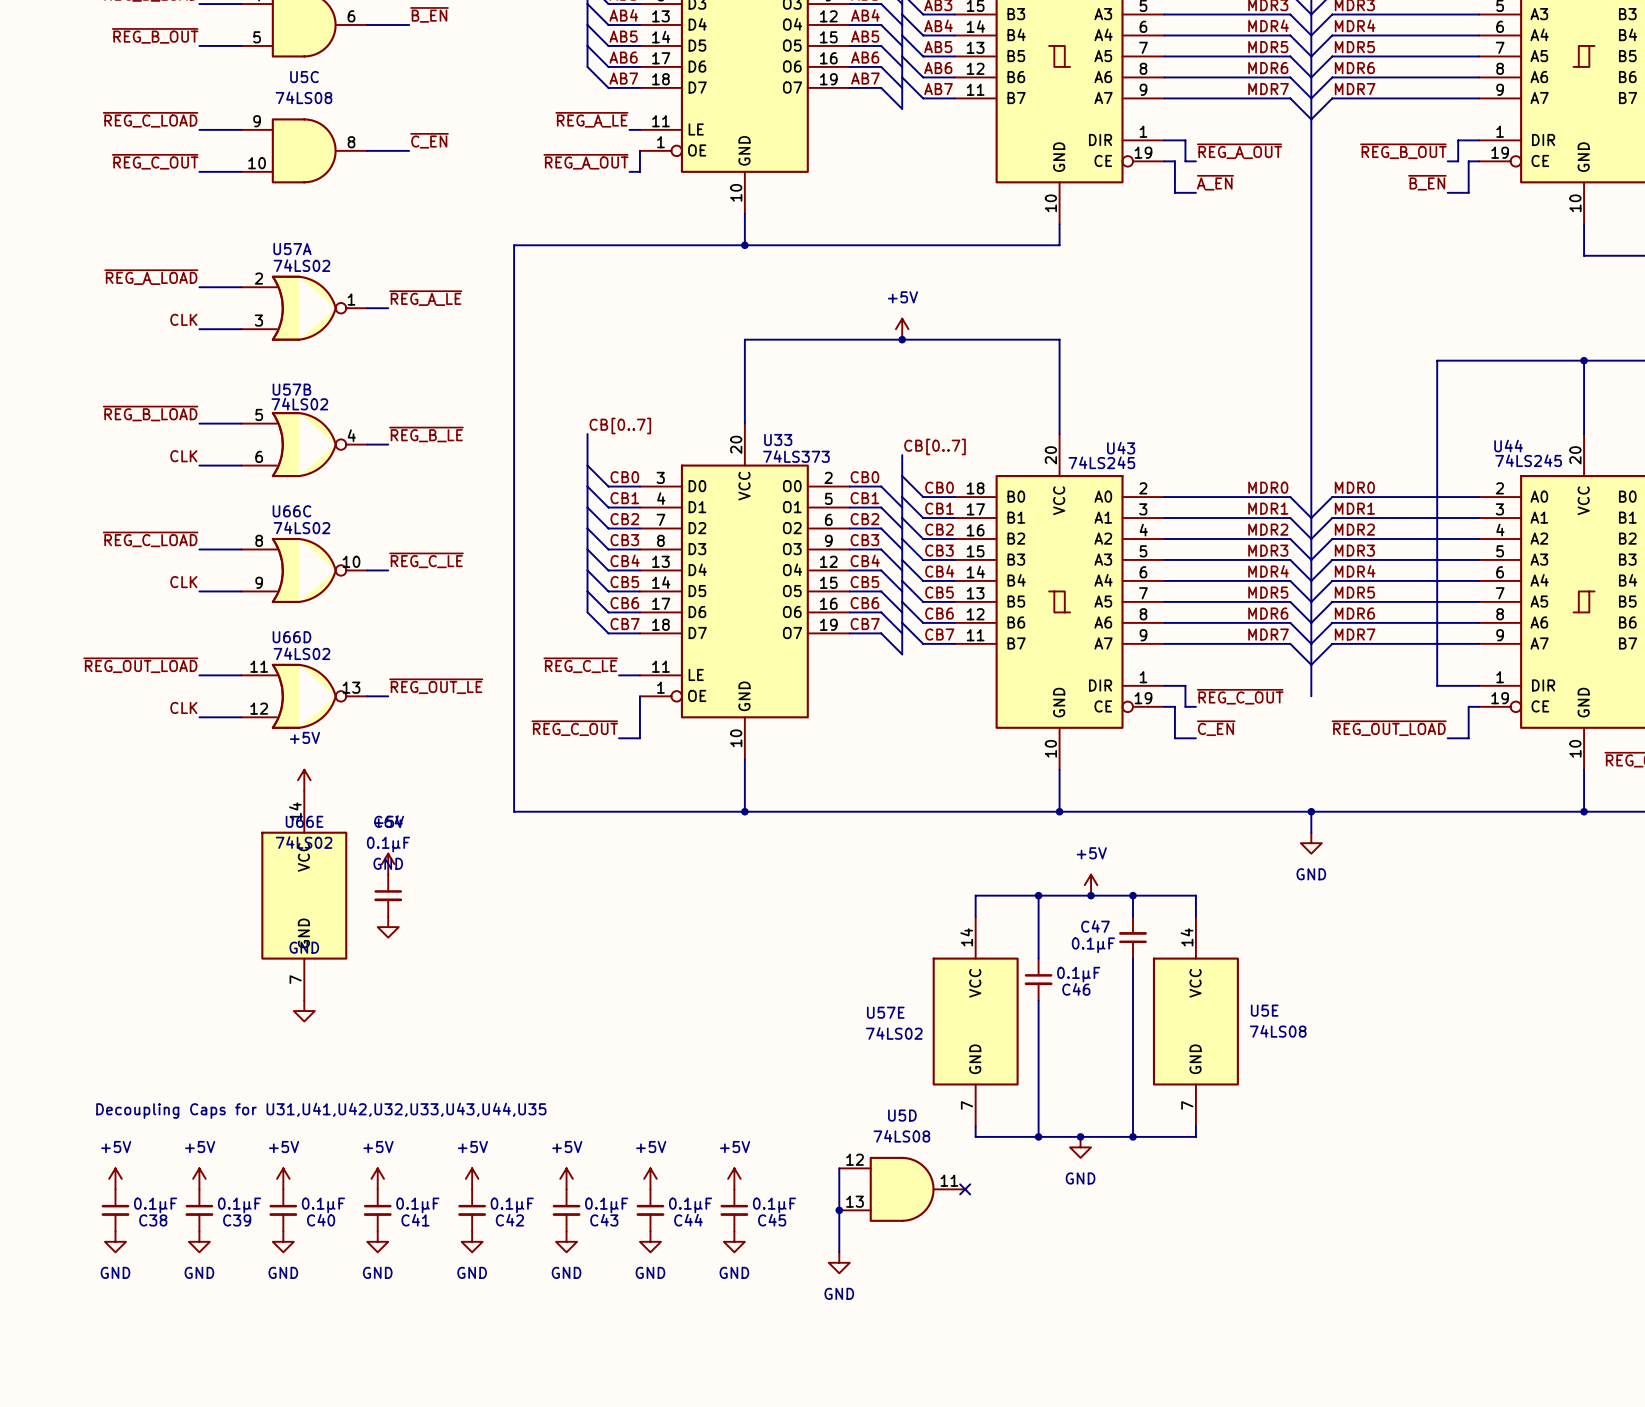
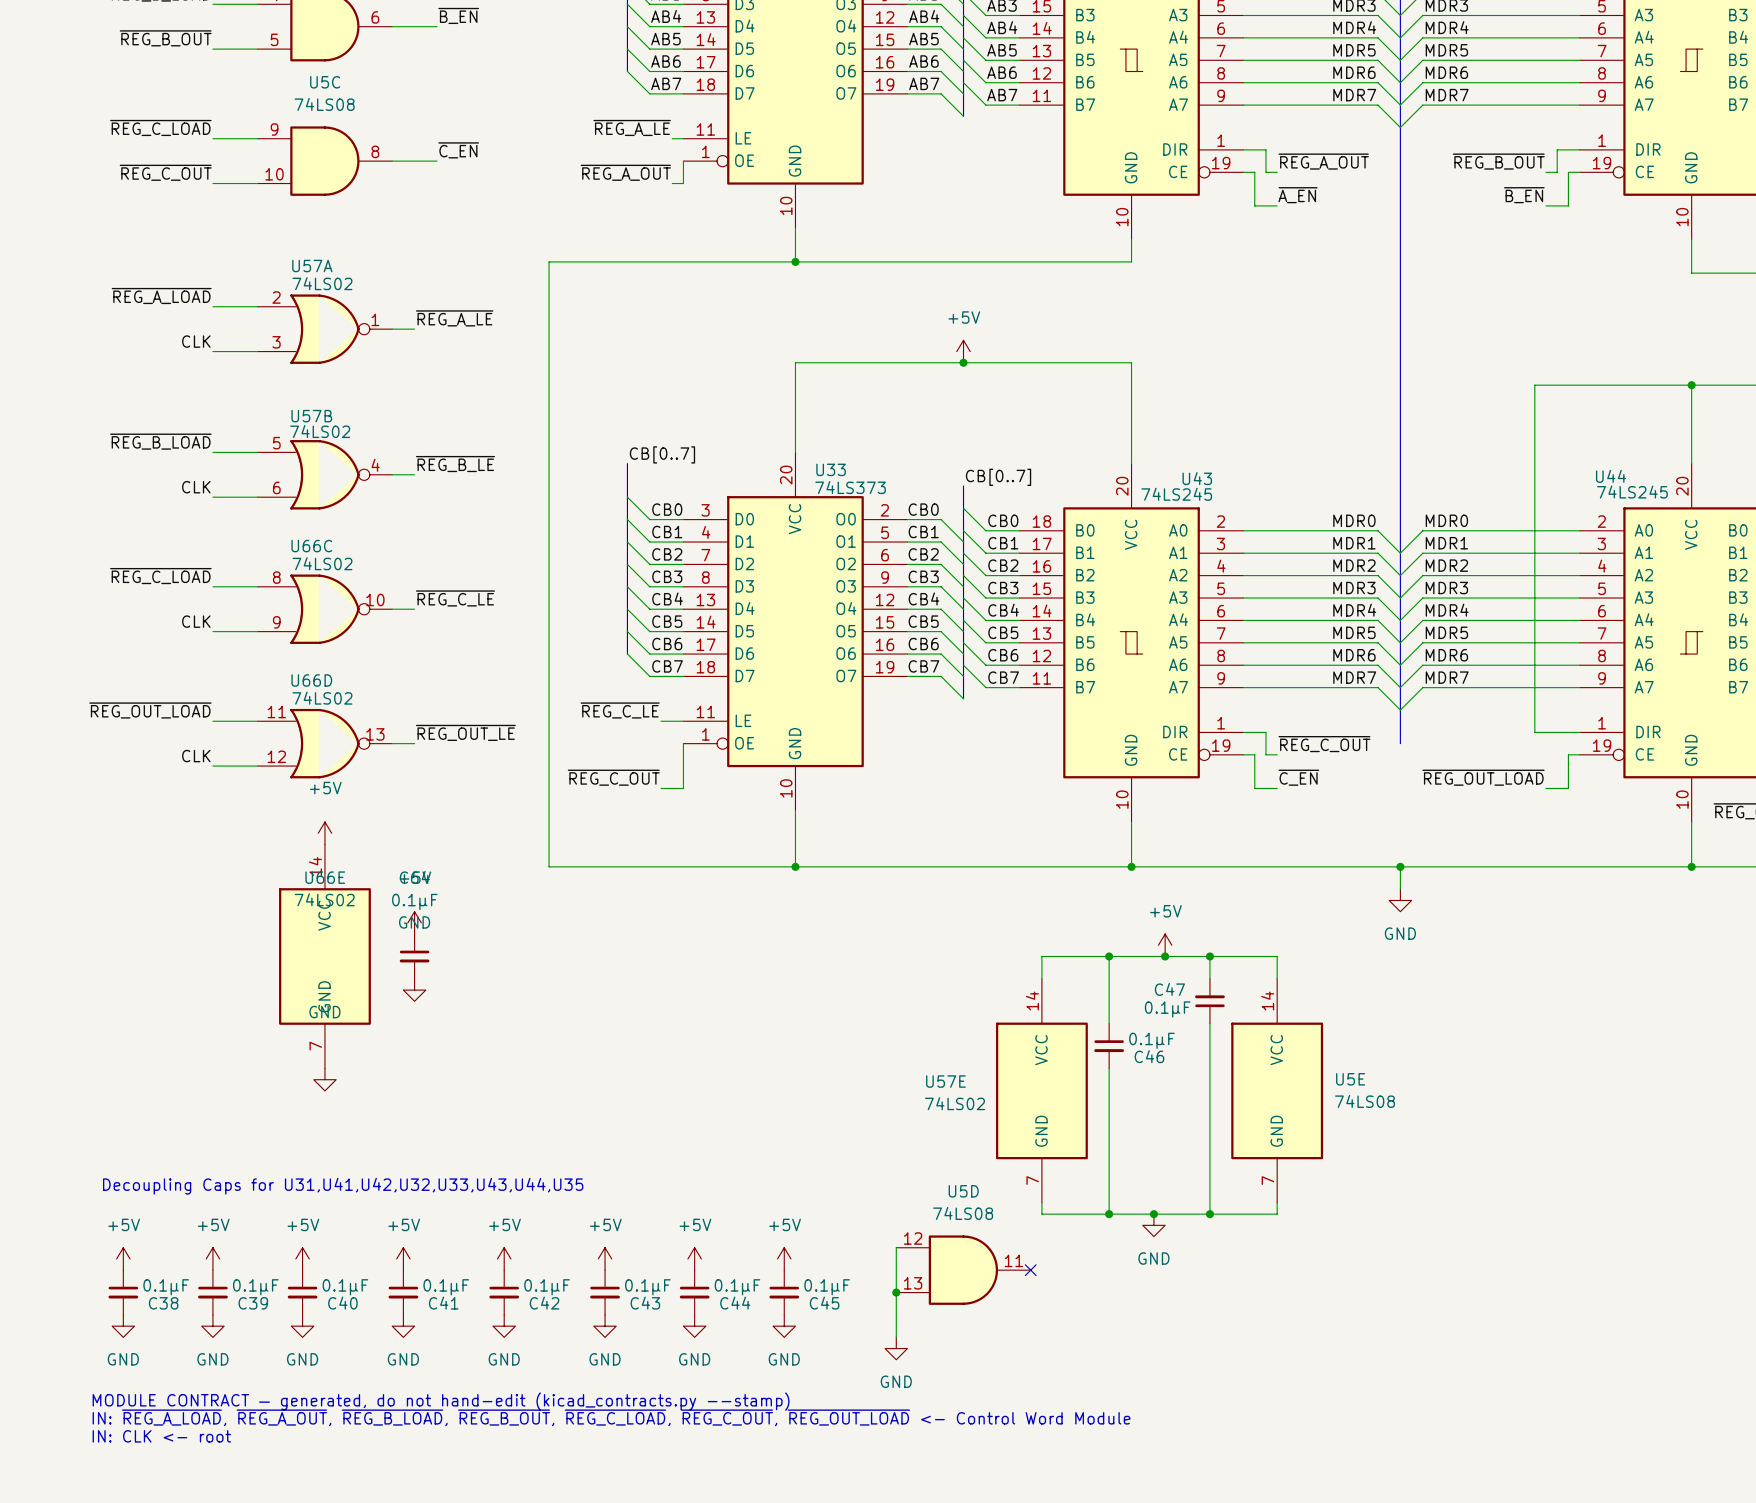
text: none -> MODULE CONTRACT — generated, do not hand-edit (kicad_contracts.py --stamp) (441, 1401)
text: none -> IN: ~{REG_A_LOAD}, ~{REG_A_OUT}, ~{REG_B_LOAD}, ~{REG_B_OUT}, ~{REG_C_LOAD}, ~{REG_C_OUT}, ~{REG_OUT_LOAD} <- Control Word Module (611, 1417)
text: none -> IN: CLK <- root (161, 1436)

